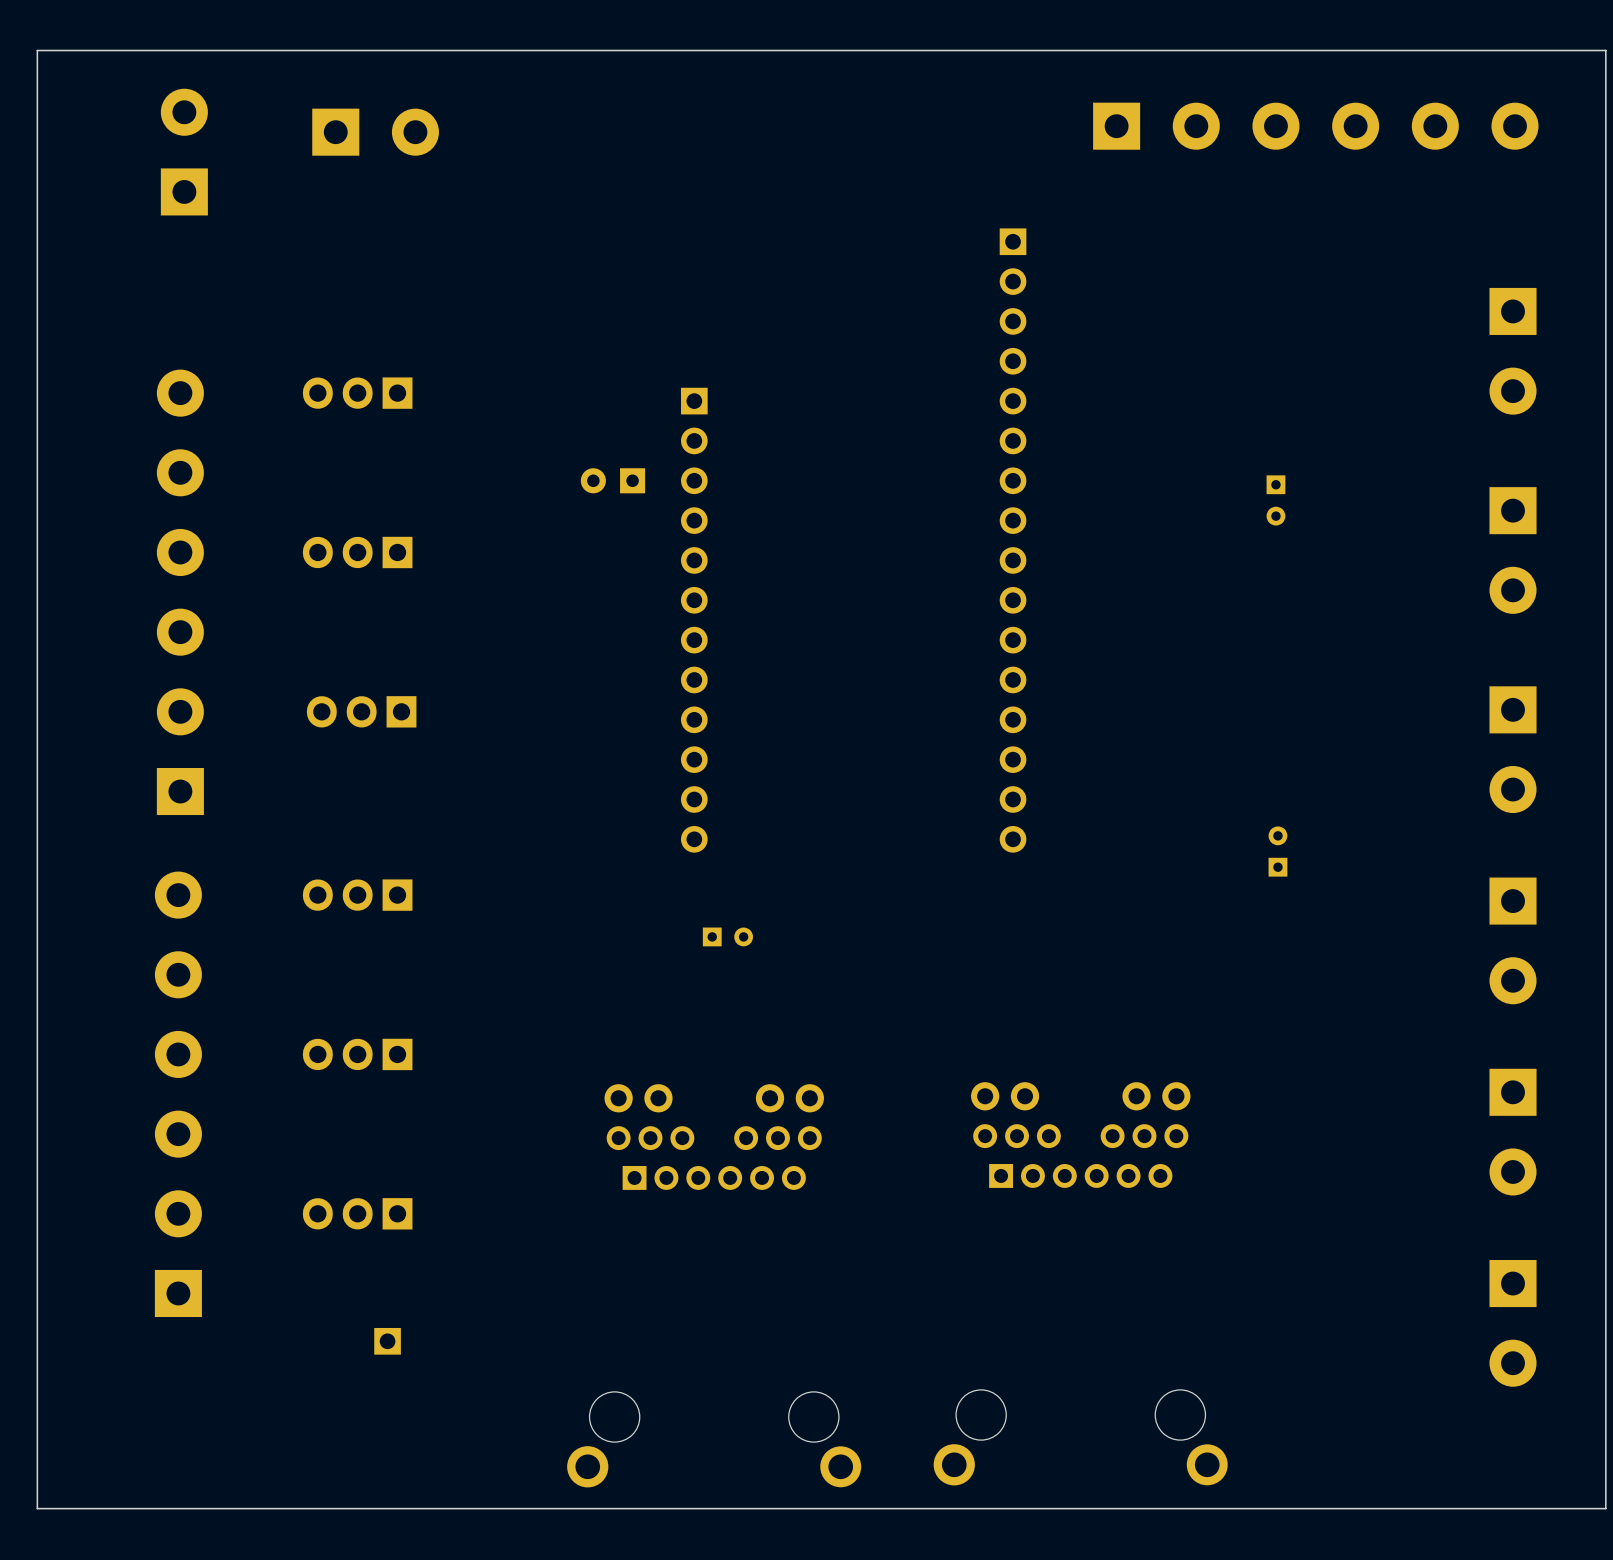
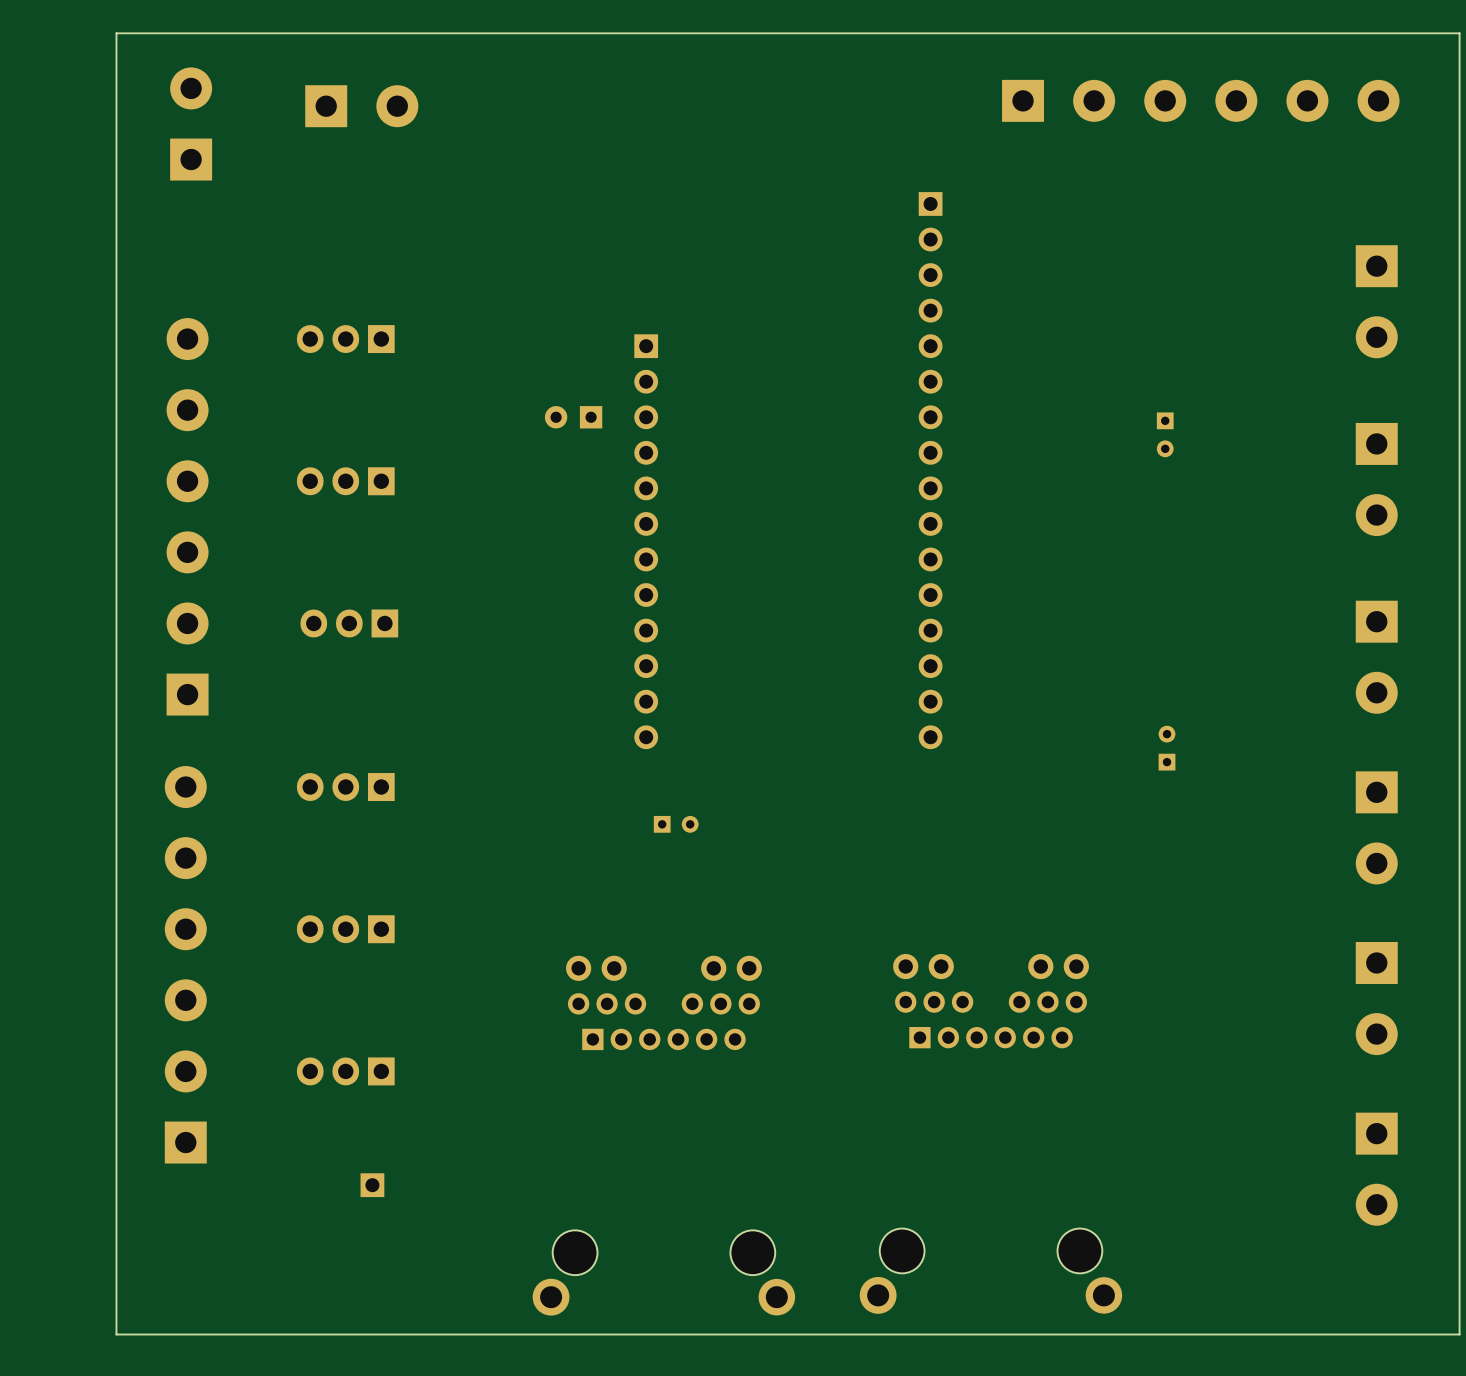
board edge: (100, 50) (37, 50) (37, 1508) (100, 1508) -> (116, 33) (116, 1334)

